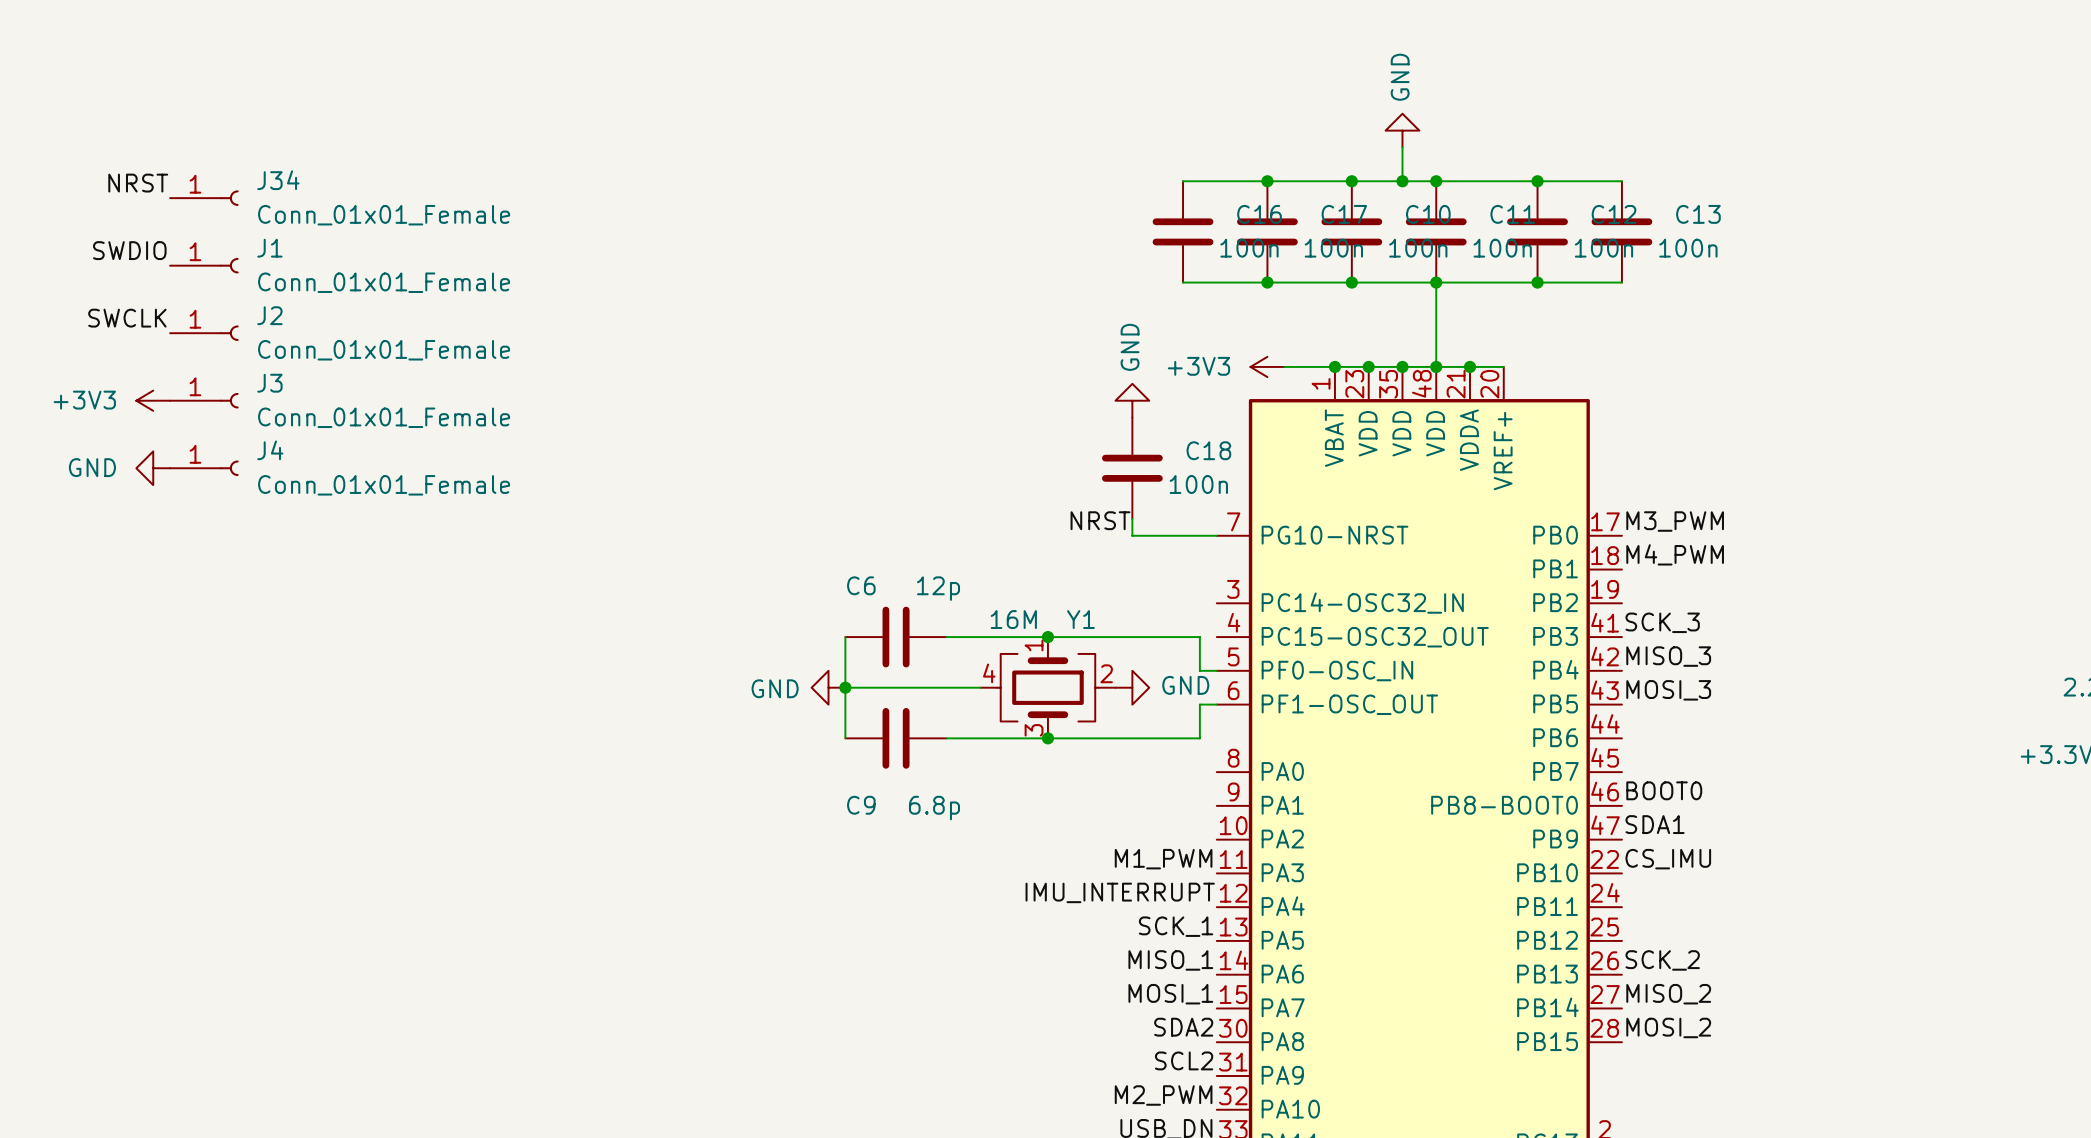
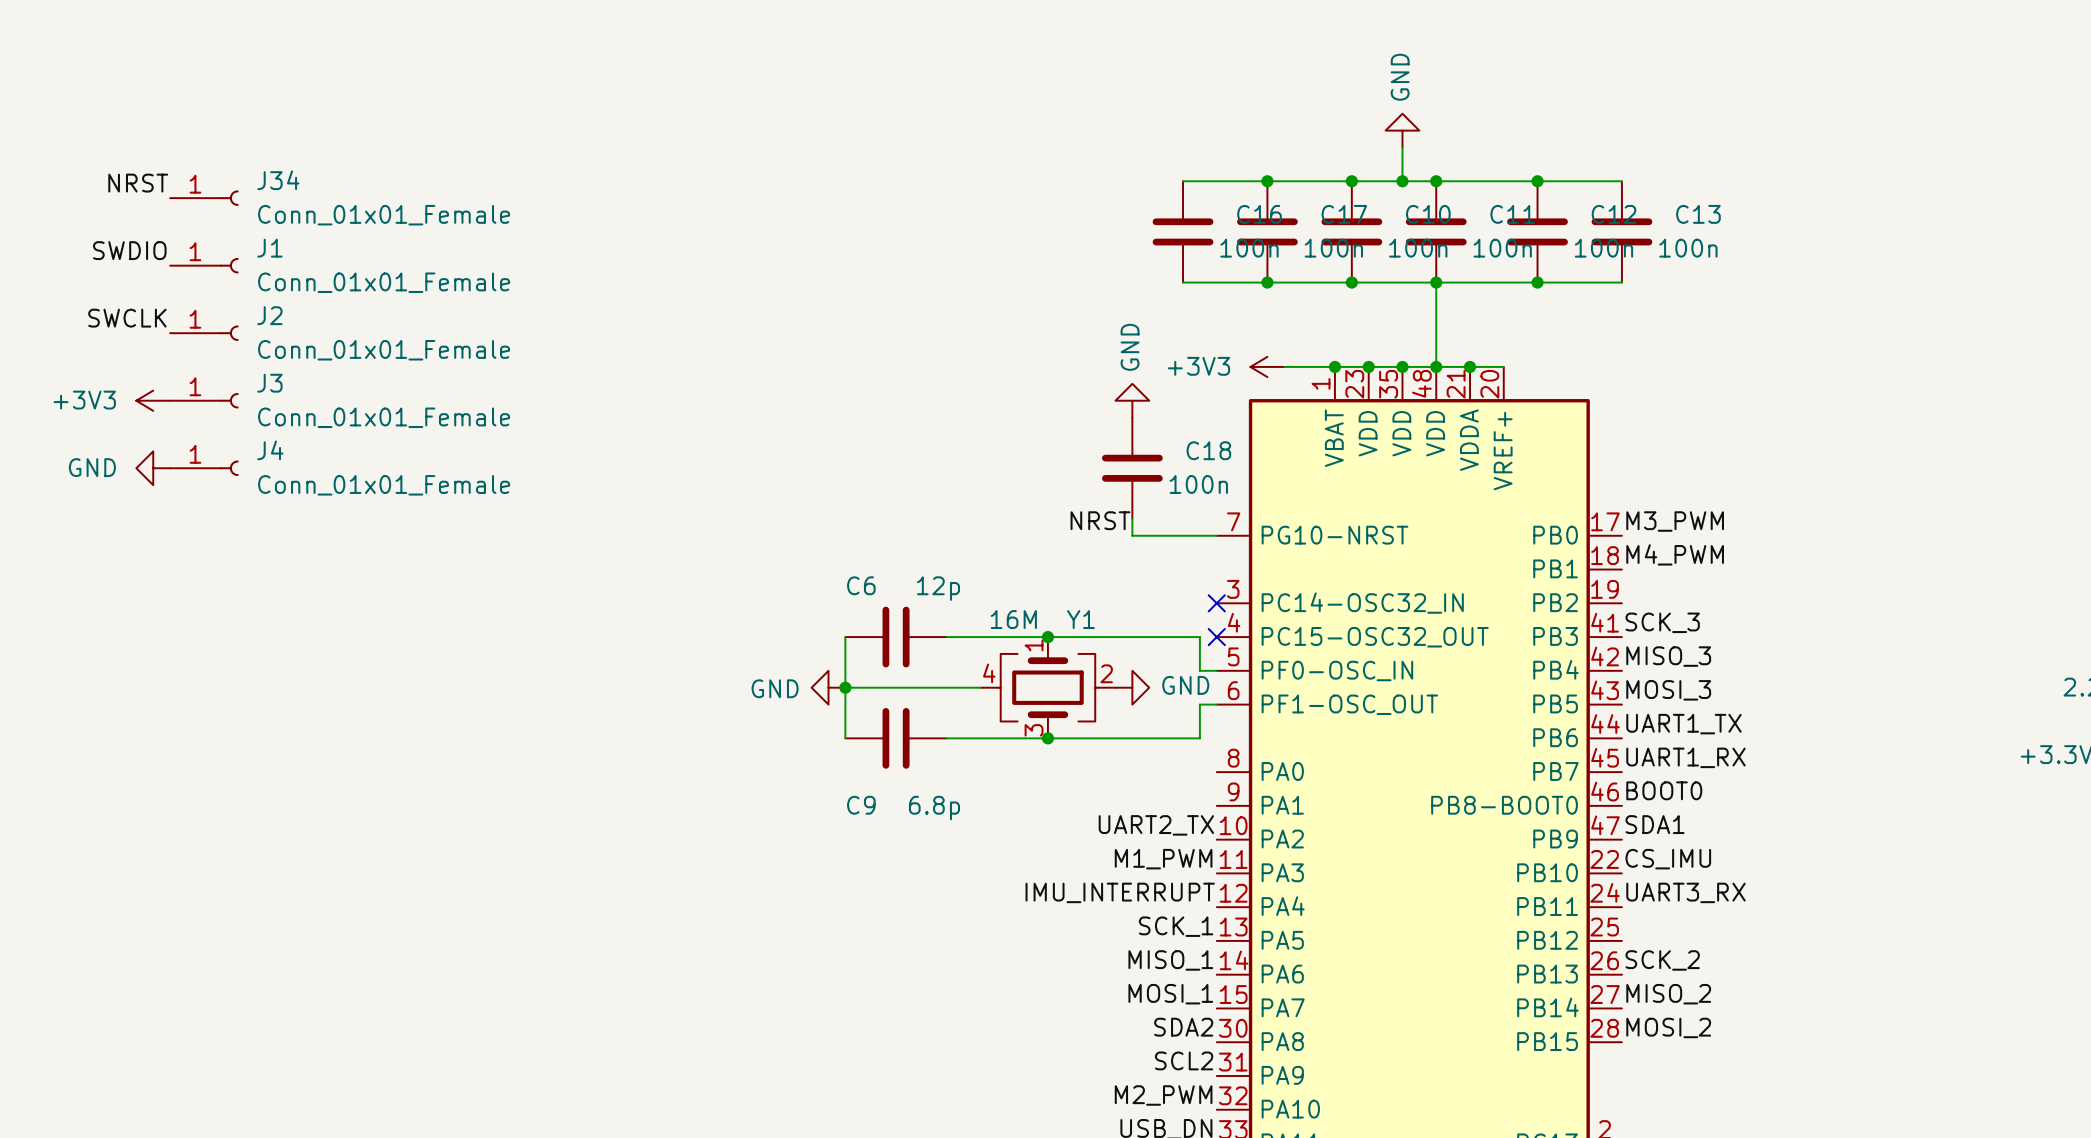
no-connect mark: none -> (1216, 603)
no-connect mark: none -> (1216, 637)
label: none -> UART1_TX (1683, 724)
label: none -> UART1_RX (1685, 757)
label: none -> UART2_TX (1156, 825)
label: none -> UART3_RX (1685, 892)

